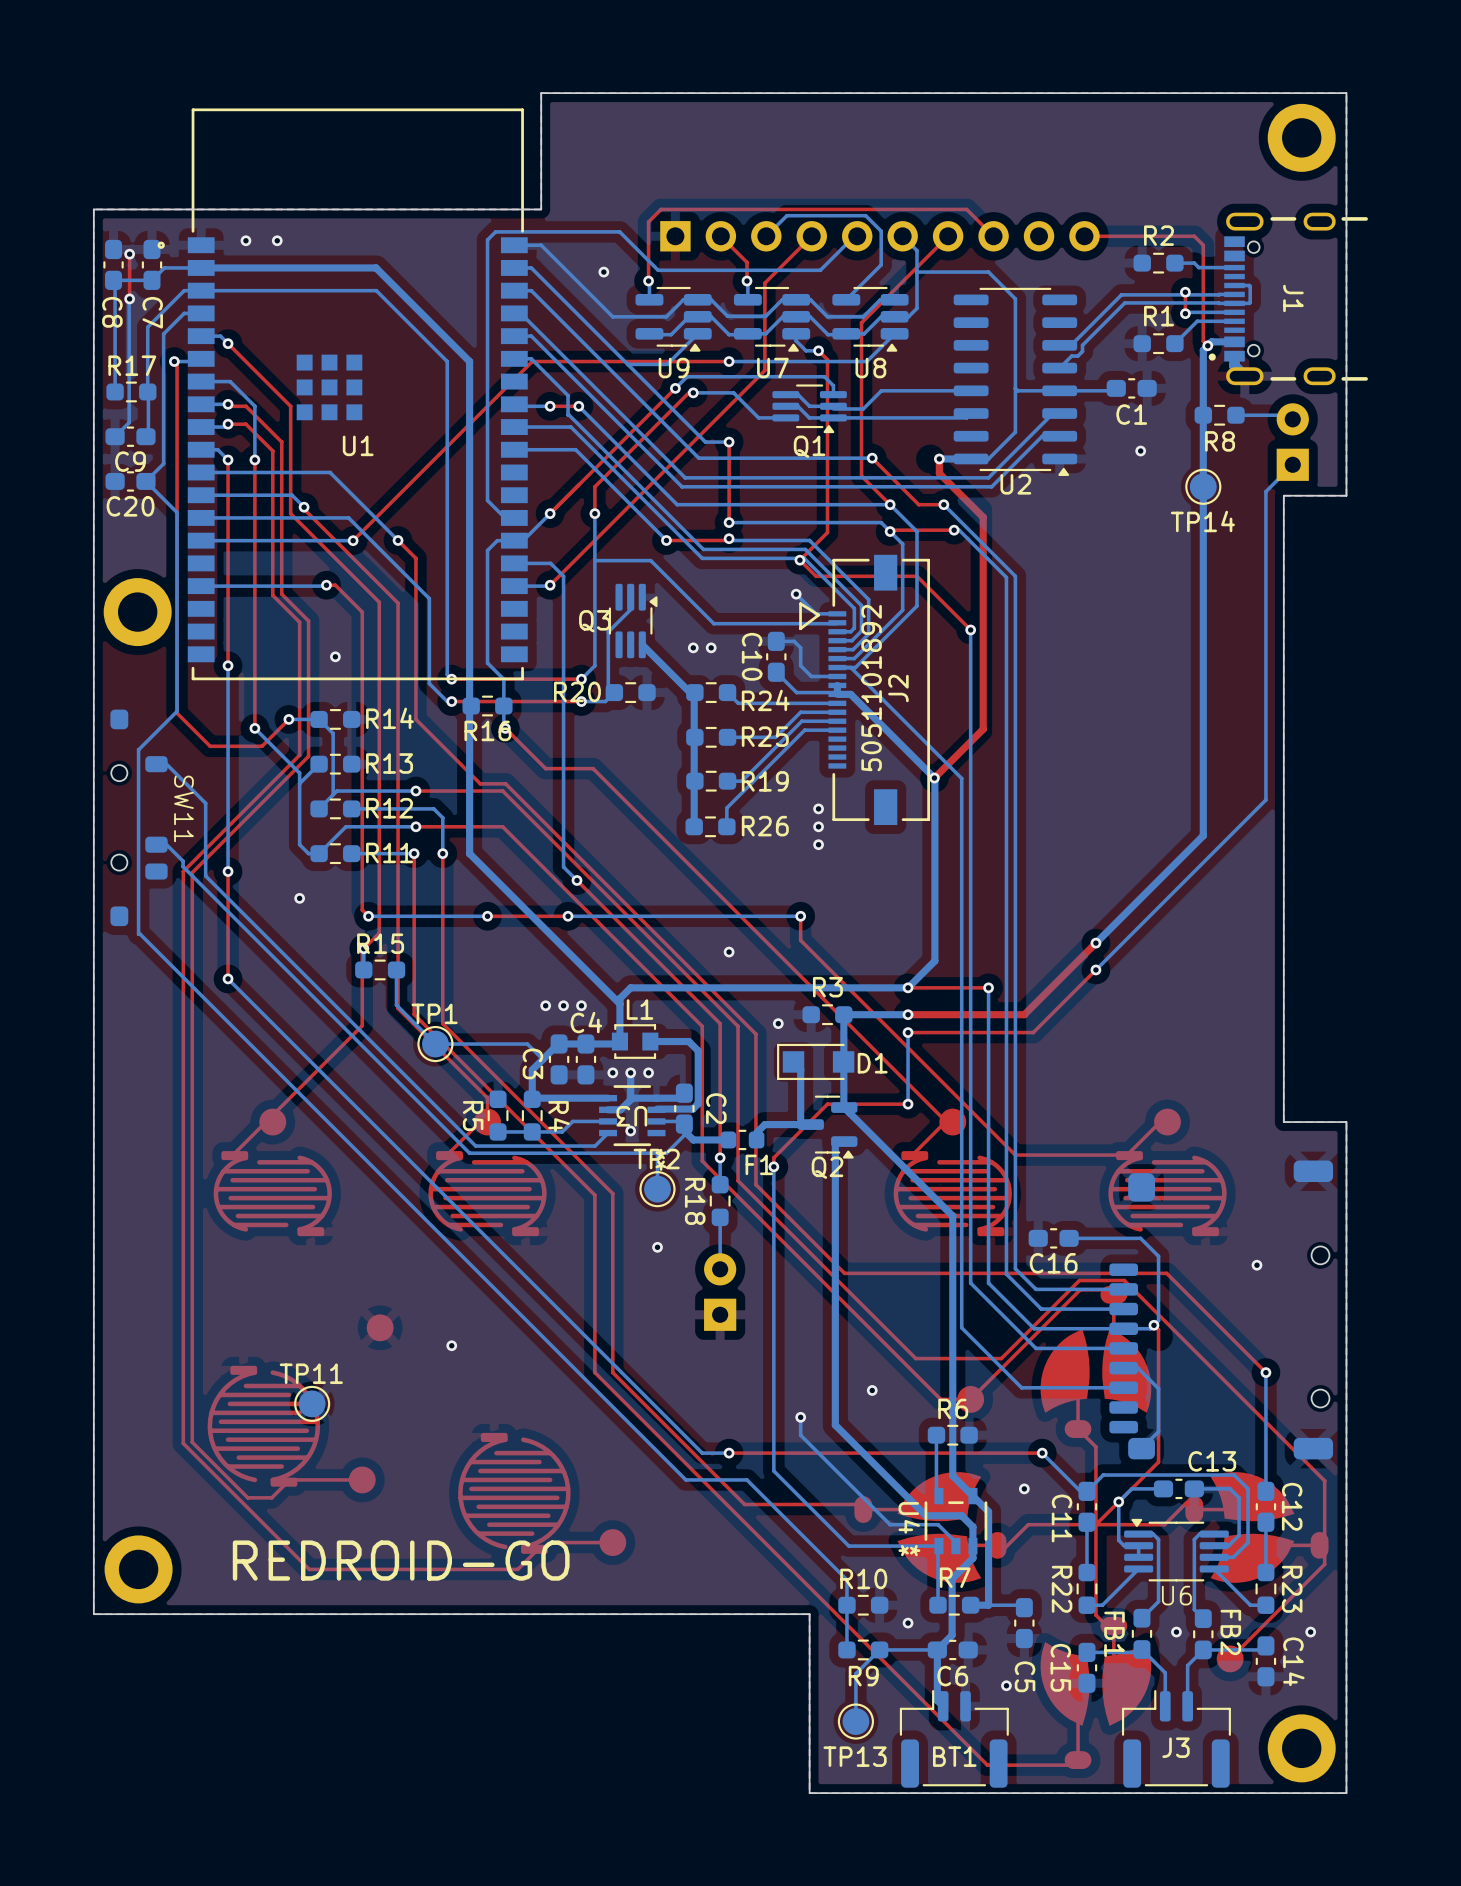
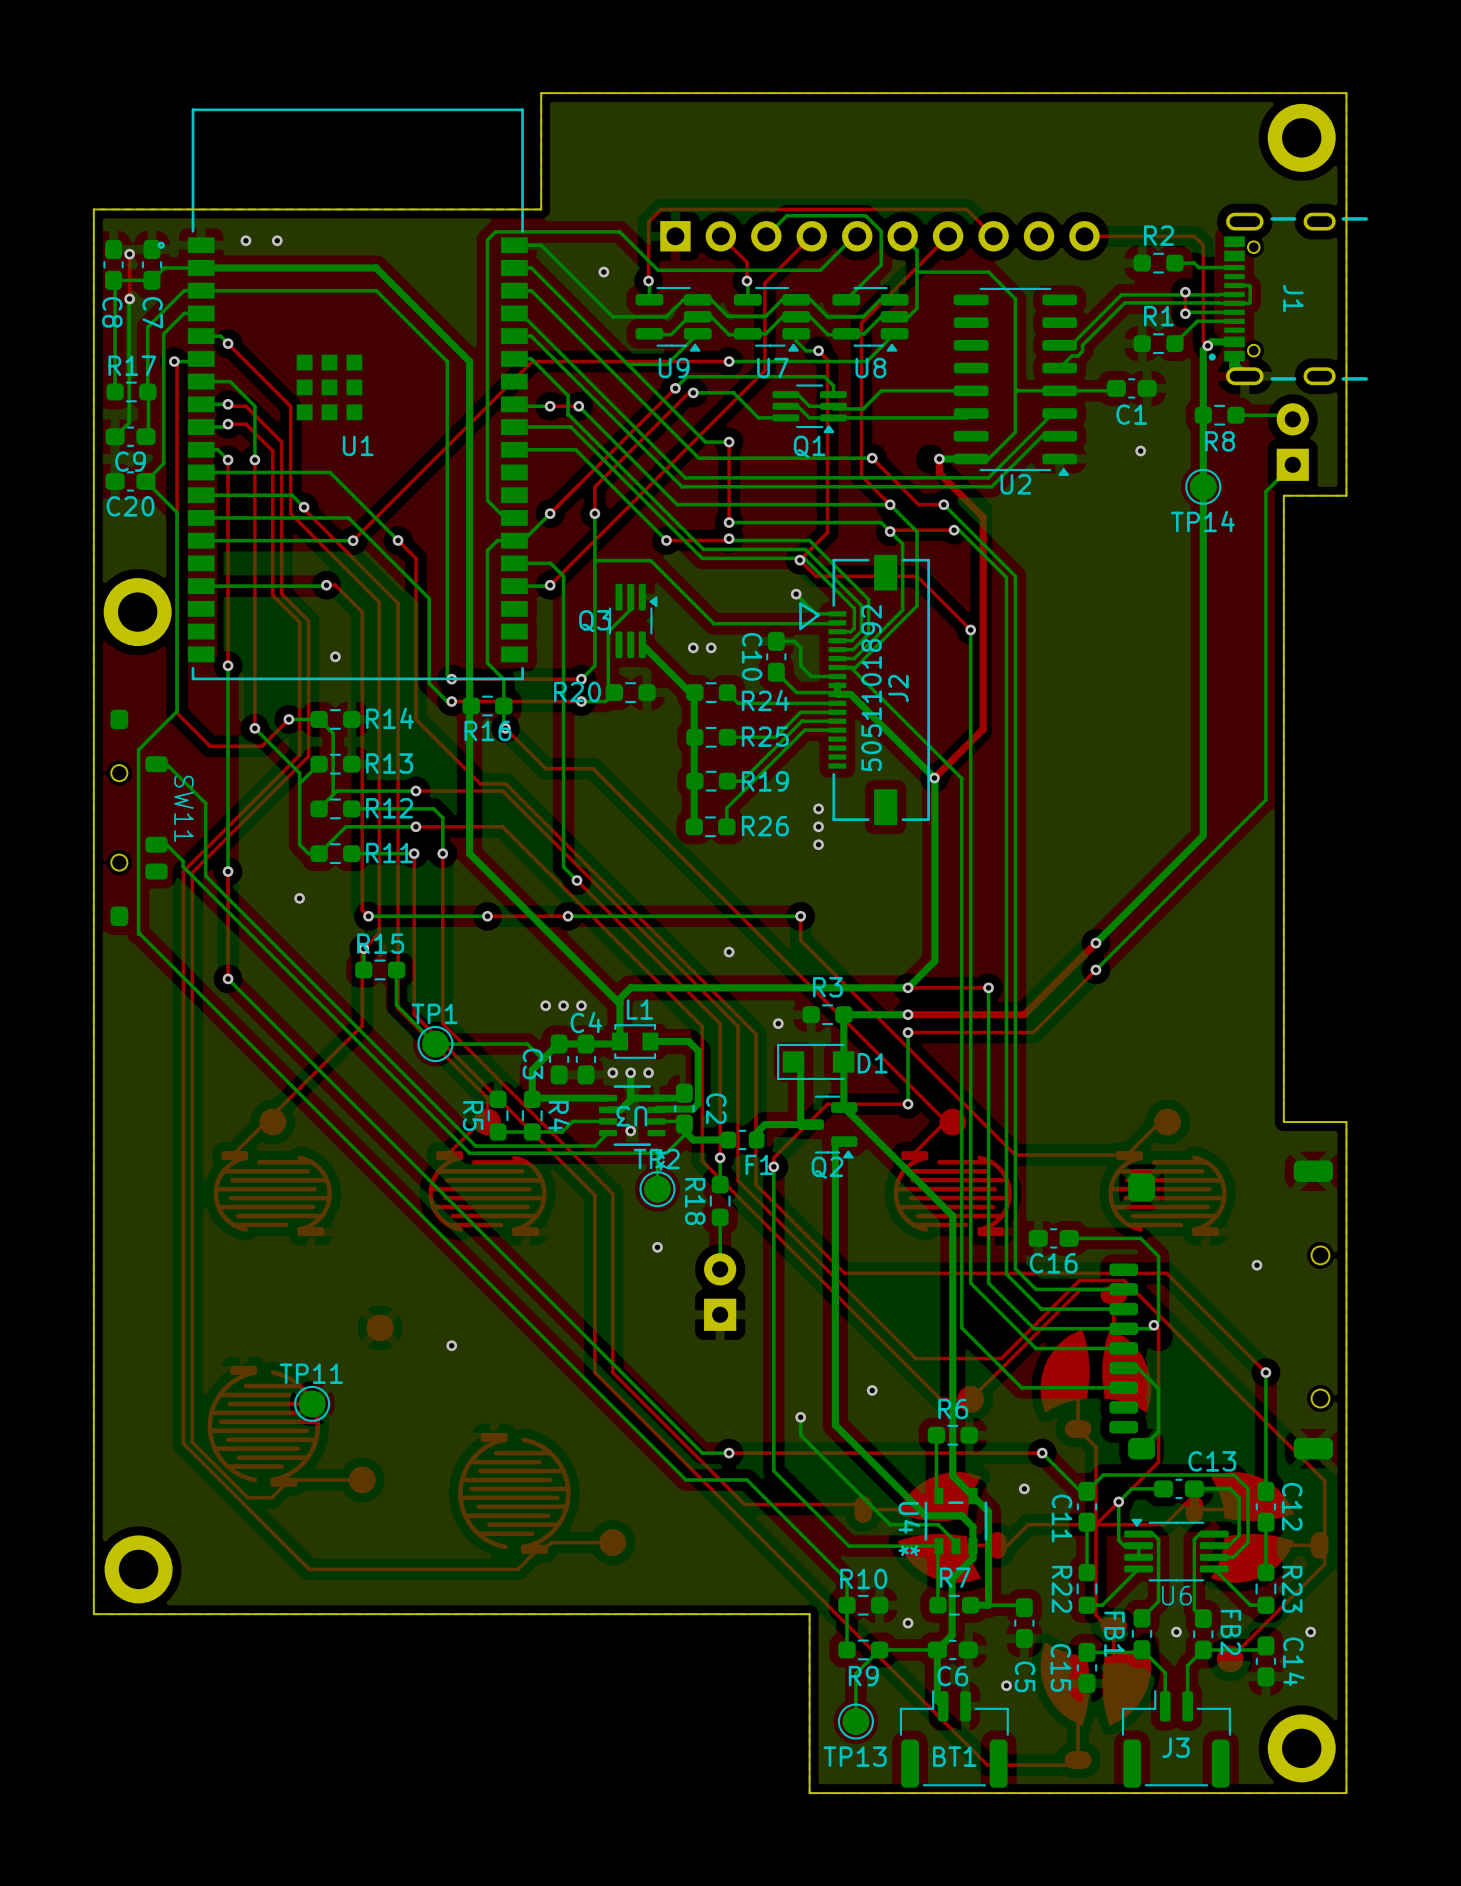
text: REDROID-GO (401, 1560) -> none

